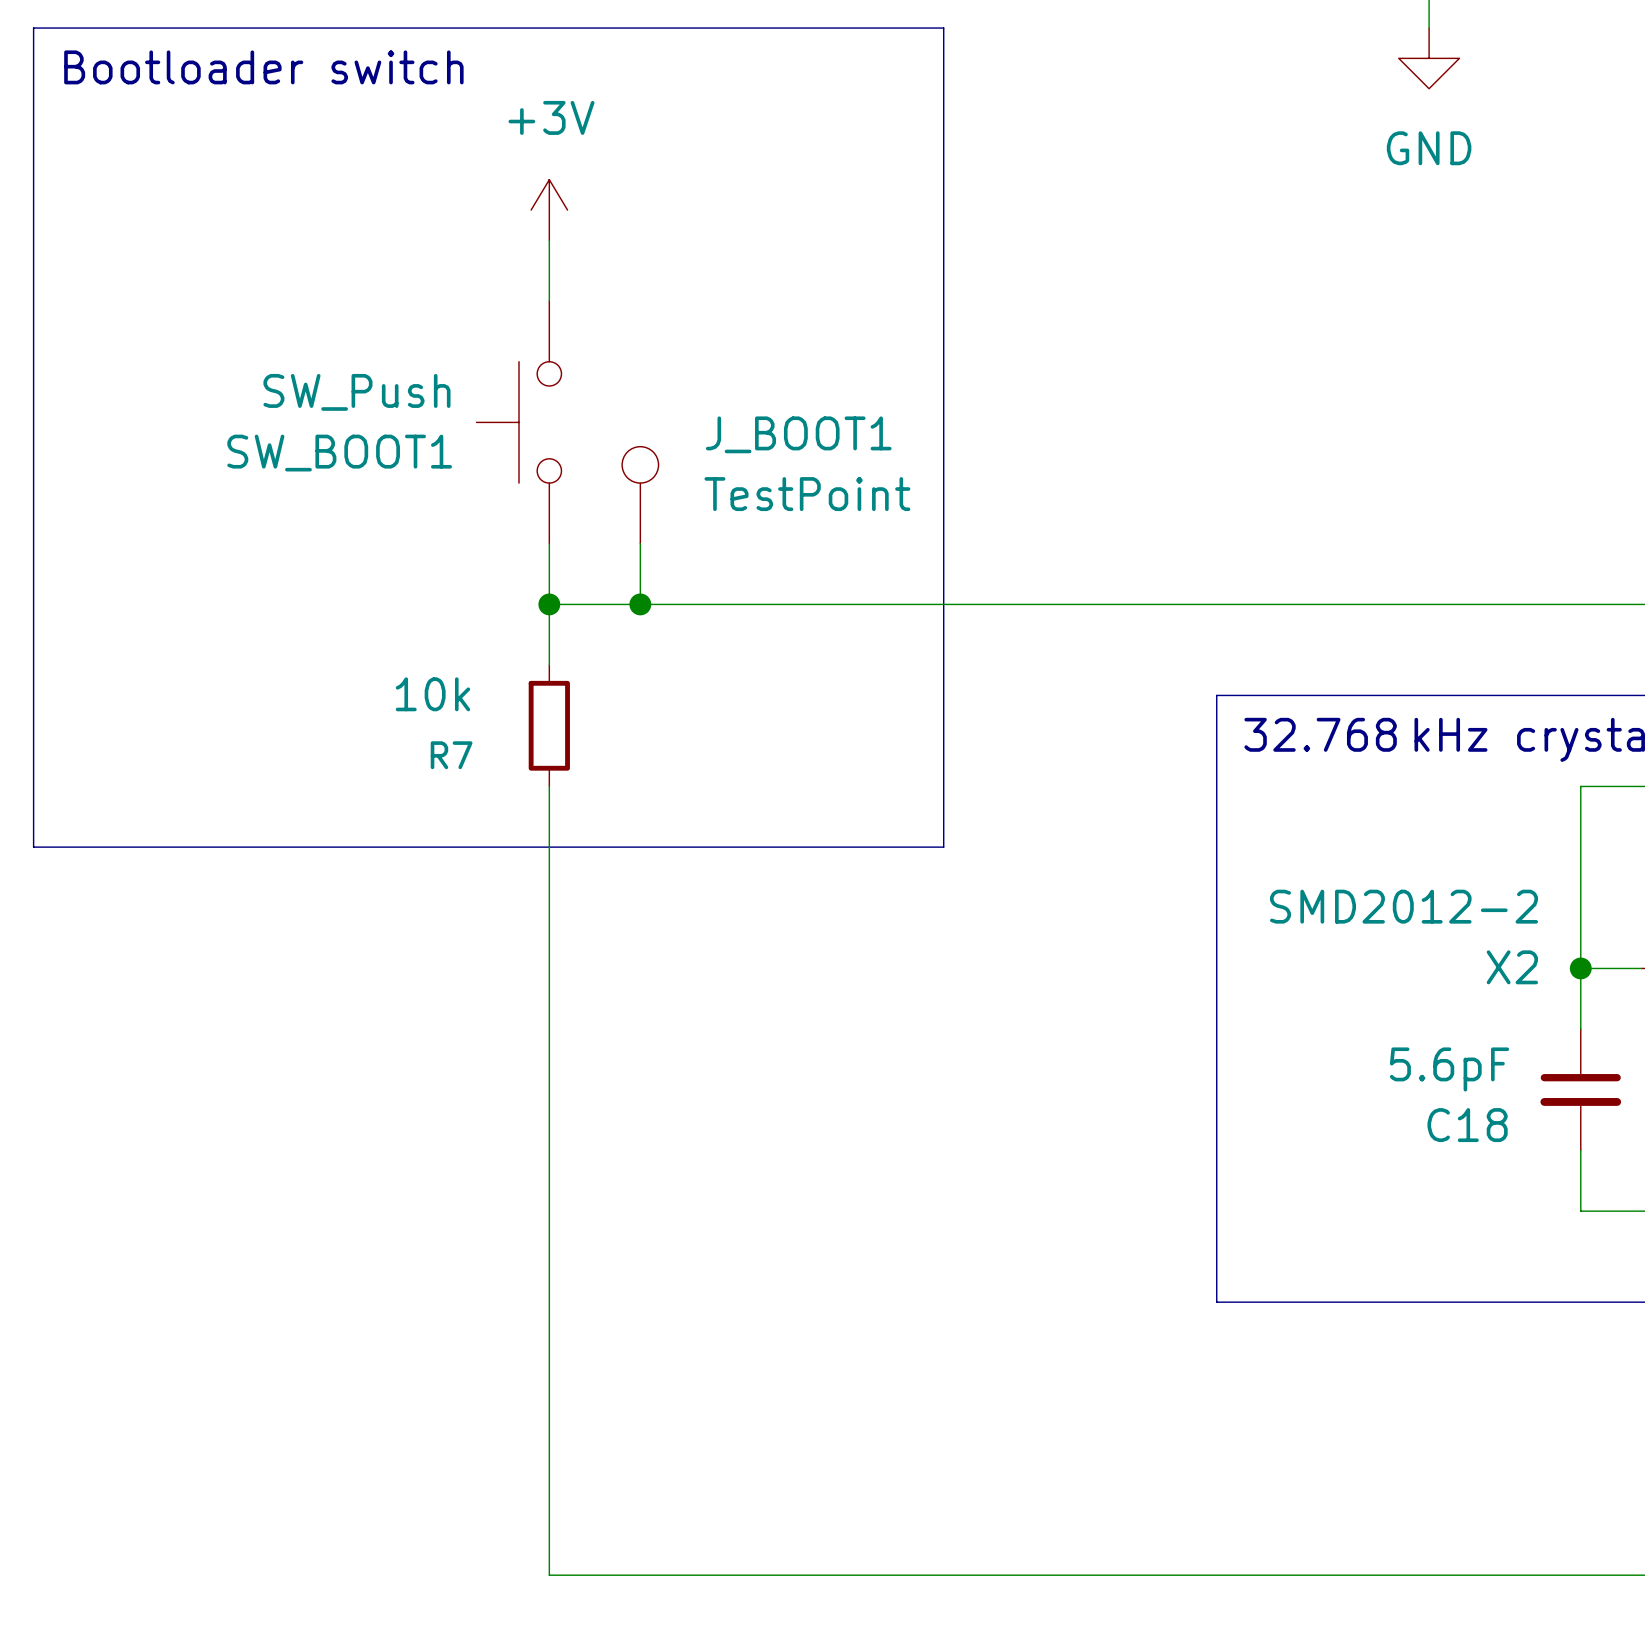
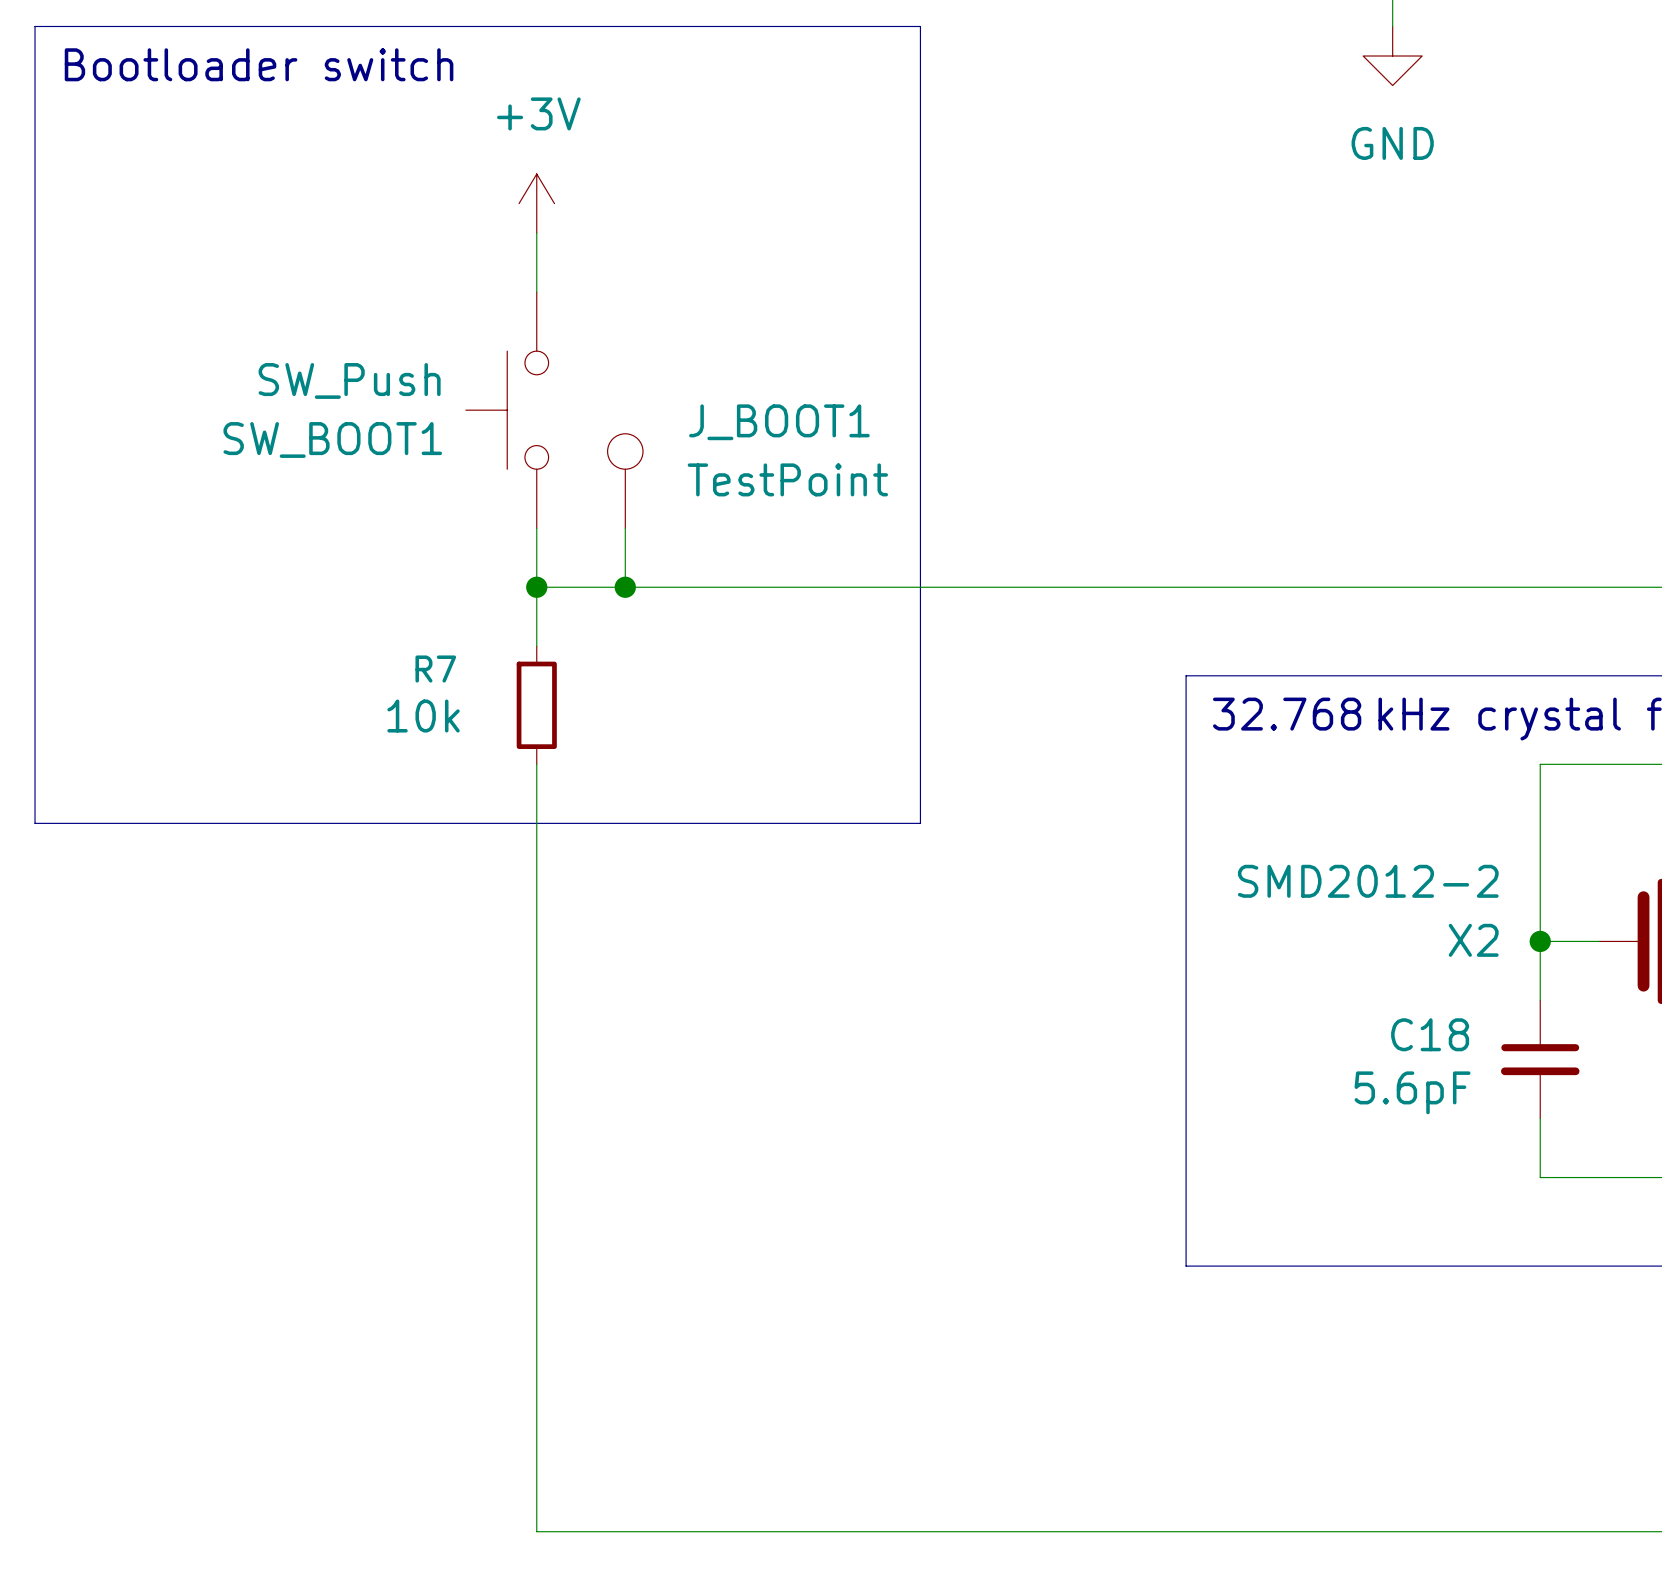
R7 value position: 10k (432, 694) -> 10k (423, 716)
R7 name position: R7 (451, 755) -> R7 (435, 669)
C18 value position: 5.6pF (1449, 1069) -> 5.6pF (1412, 1092)
C18 name position: C18 (1467, 1125) -> C18 (1430, 1034)

